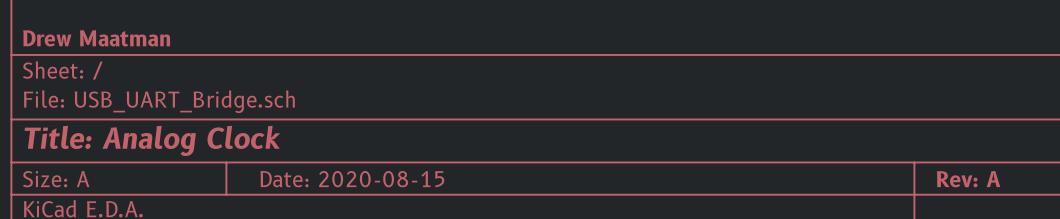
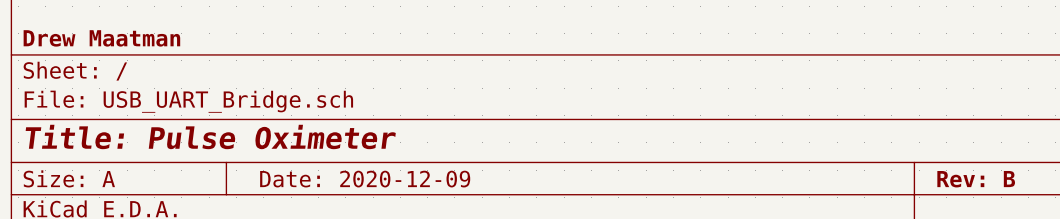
title block: Title: Analog Clock (152, 140) -> Title: Pulse Oximeter (210, 136)
title block: Date: 2020-08-15 (352, 179) -> Date: 2020-12-09 (365, 179)
title block: Rev: A (968, 179) -> Rev: B (976, 179)

